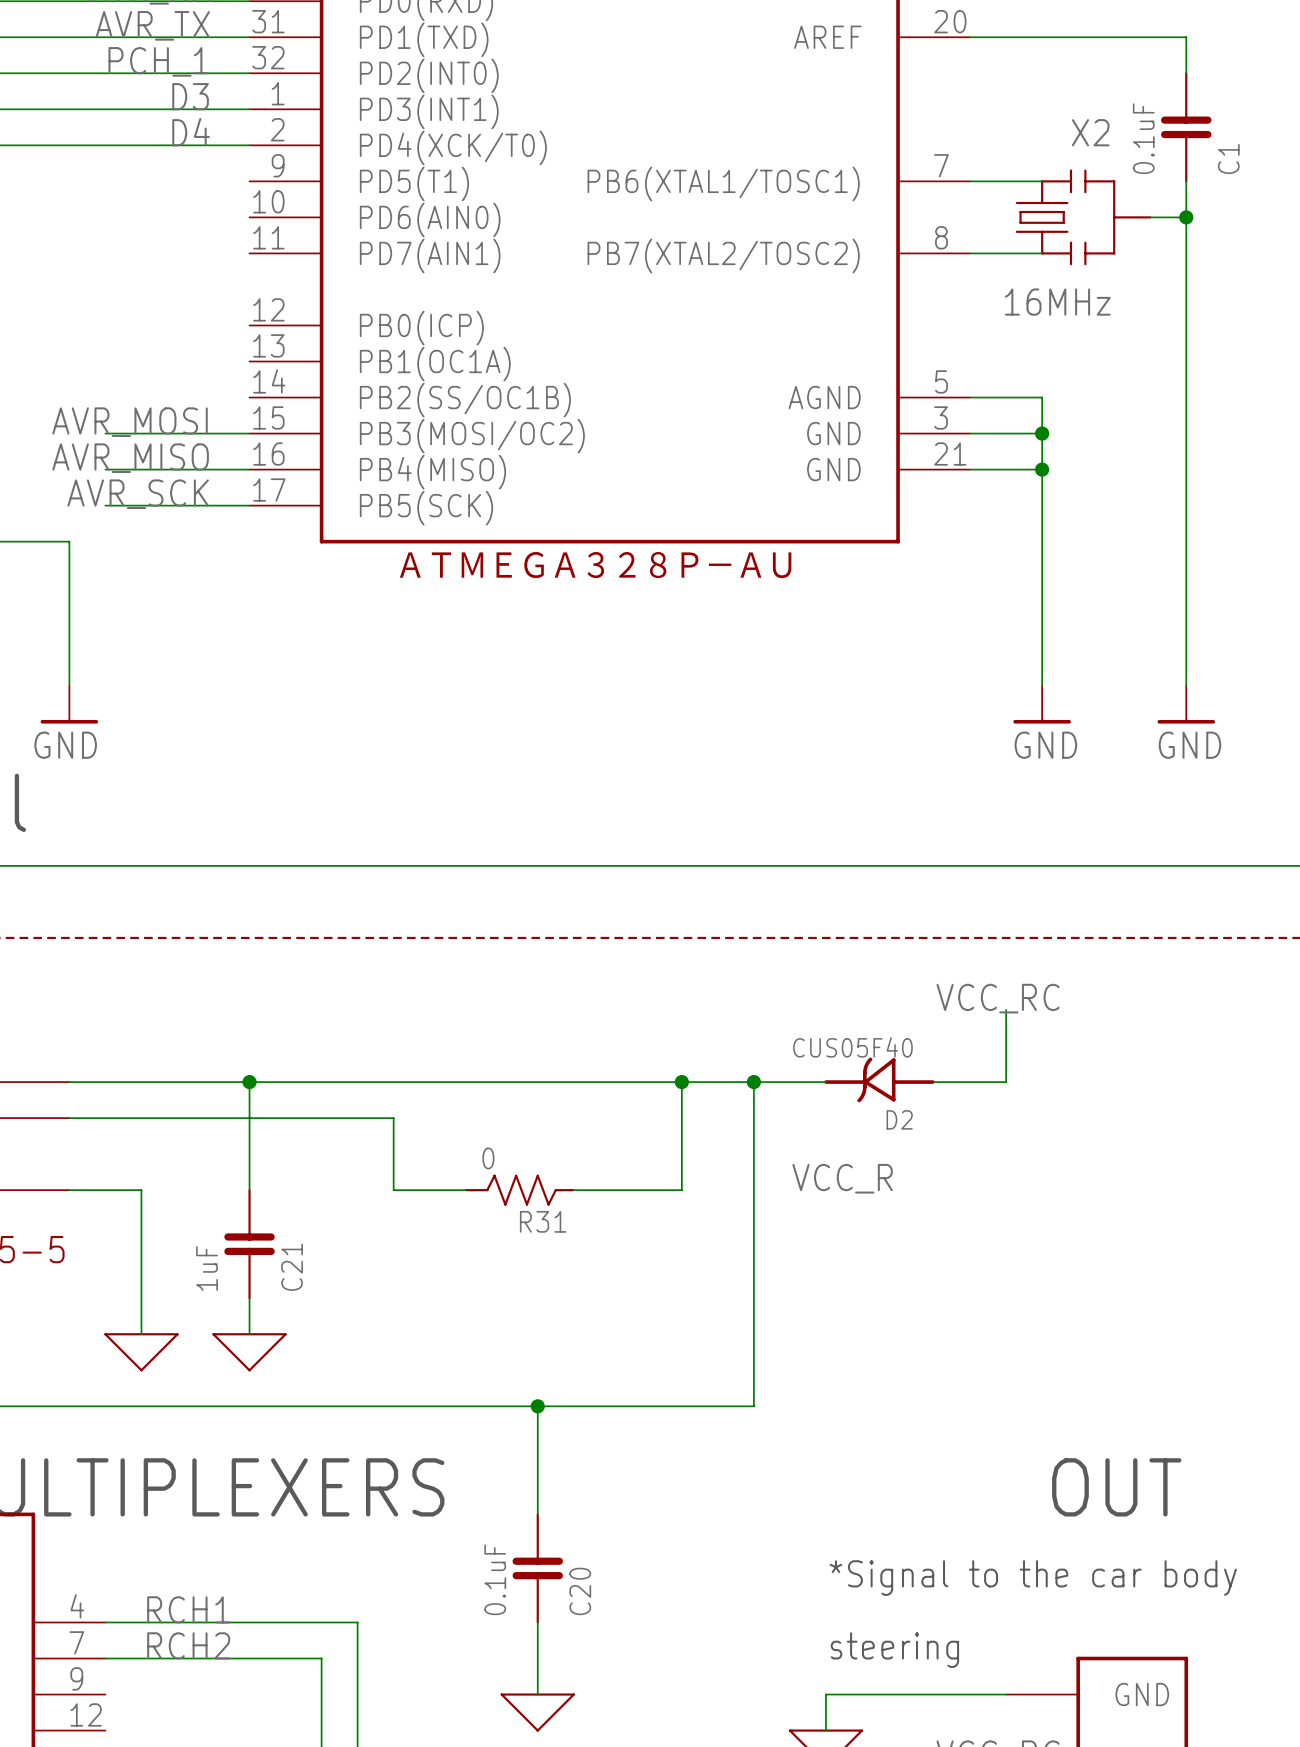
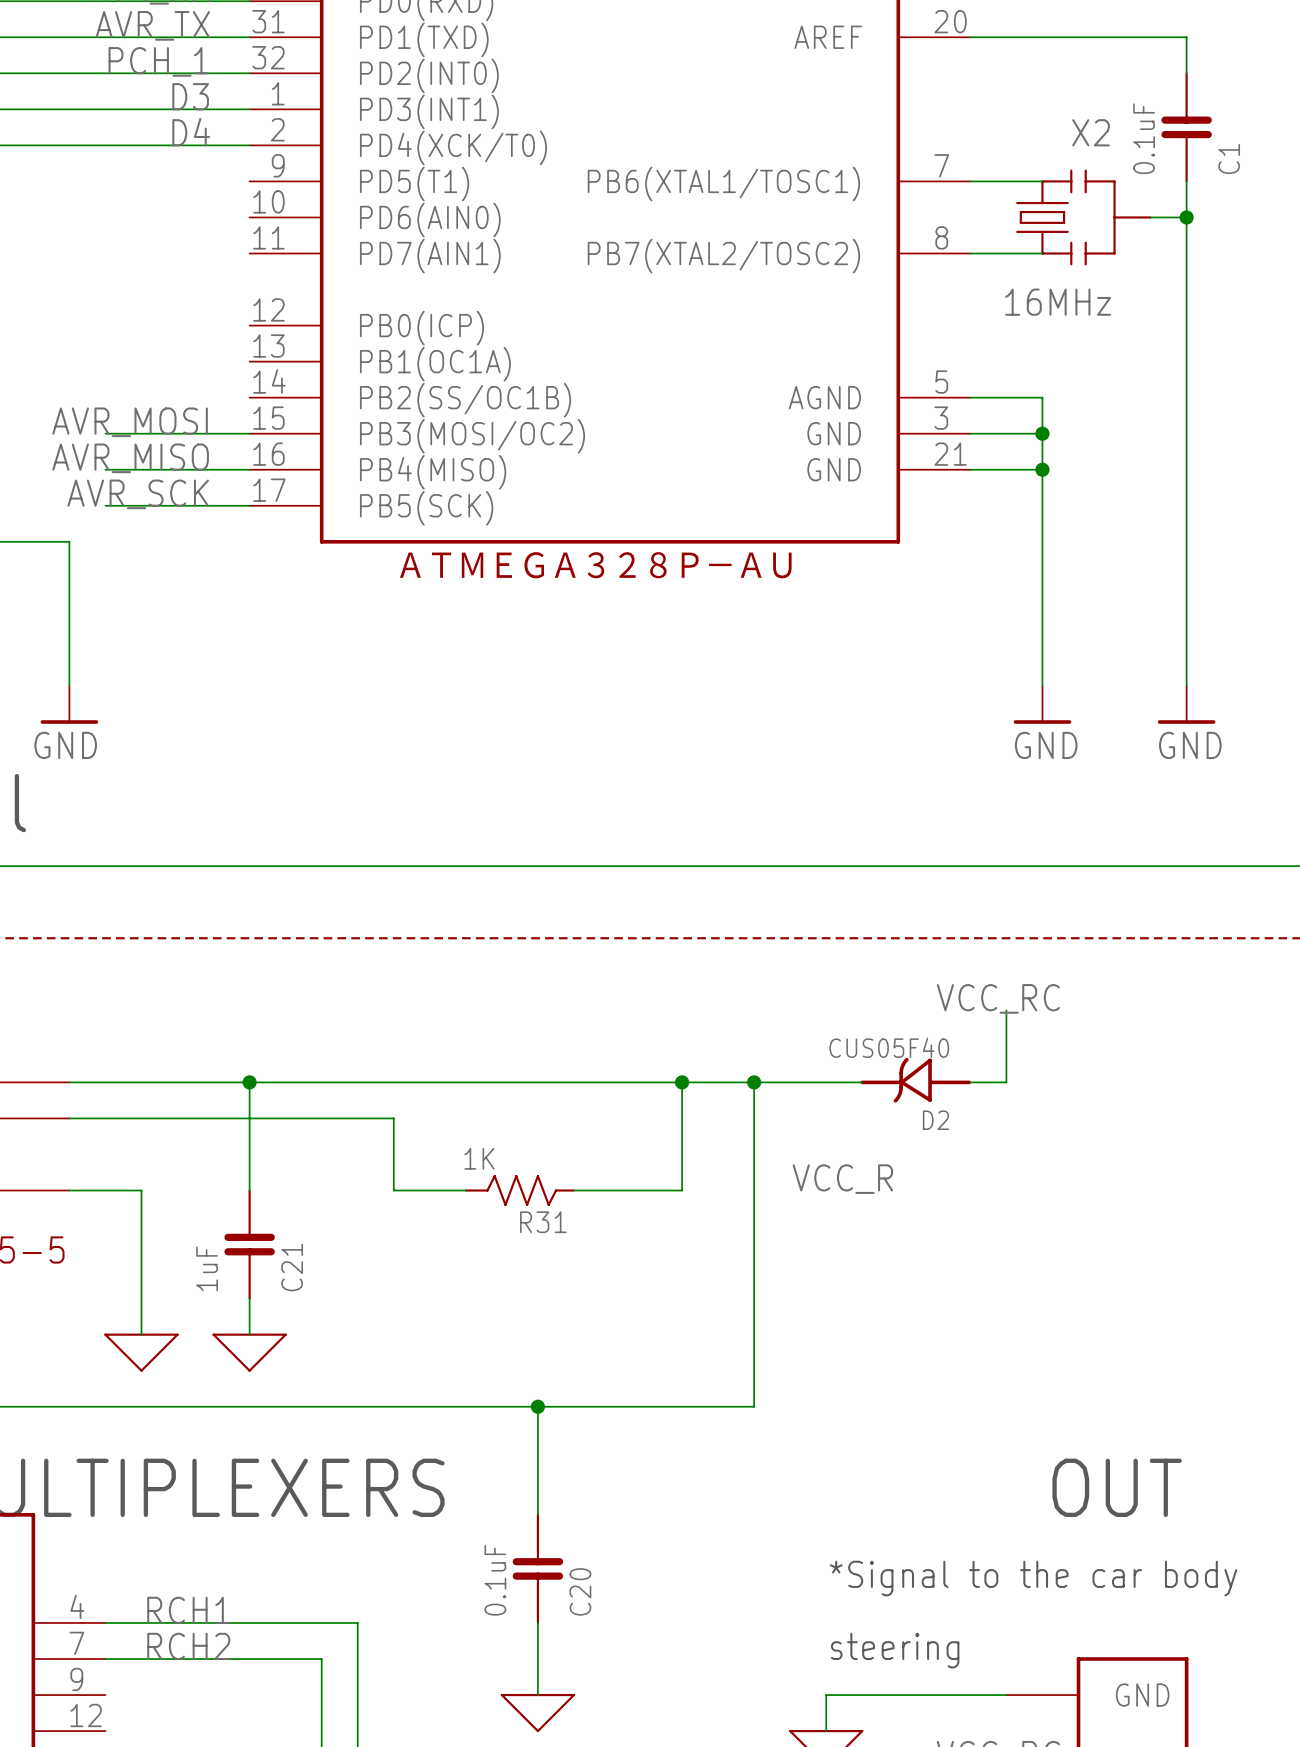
D2 position: (879, 1079) -> (915, 1080)
R31 value: 0 (488, 1158) -> 1K (479, 1158)

